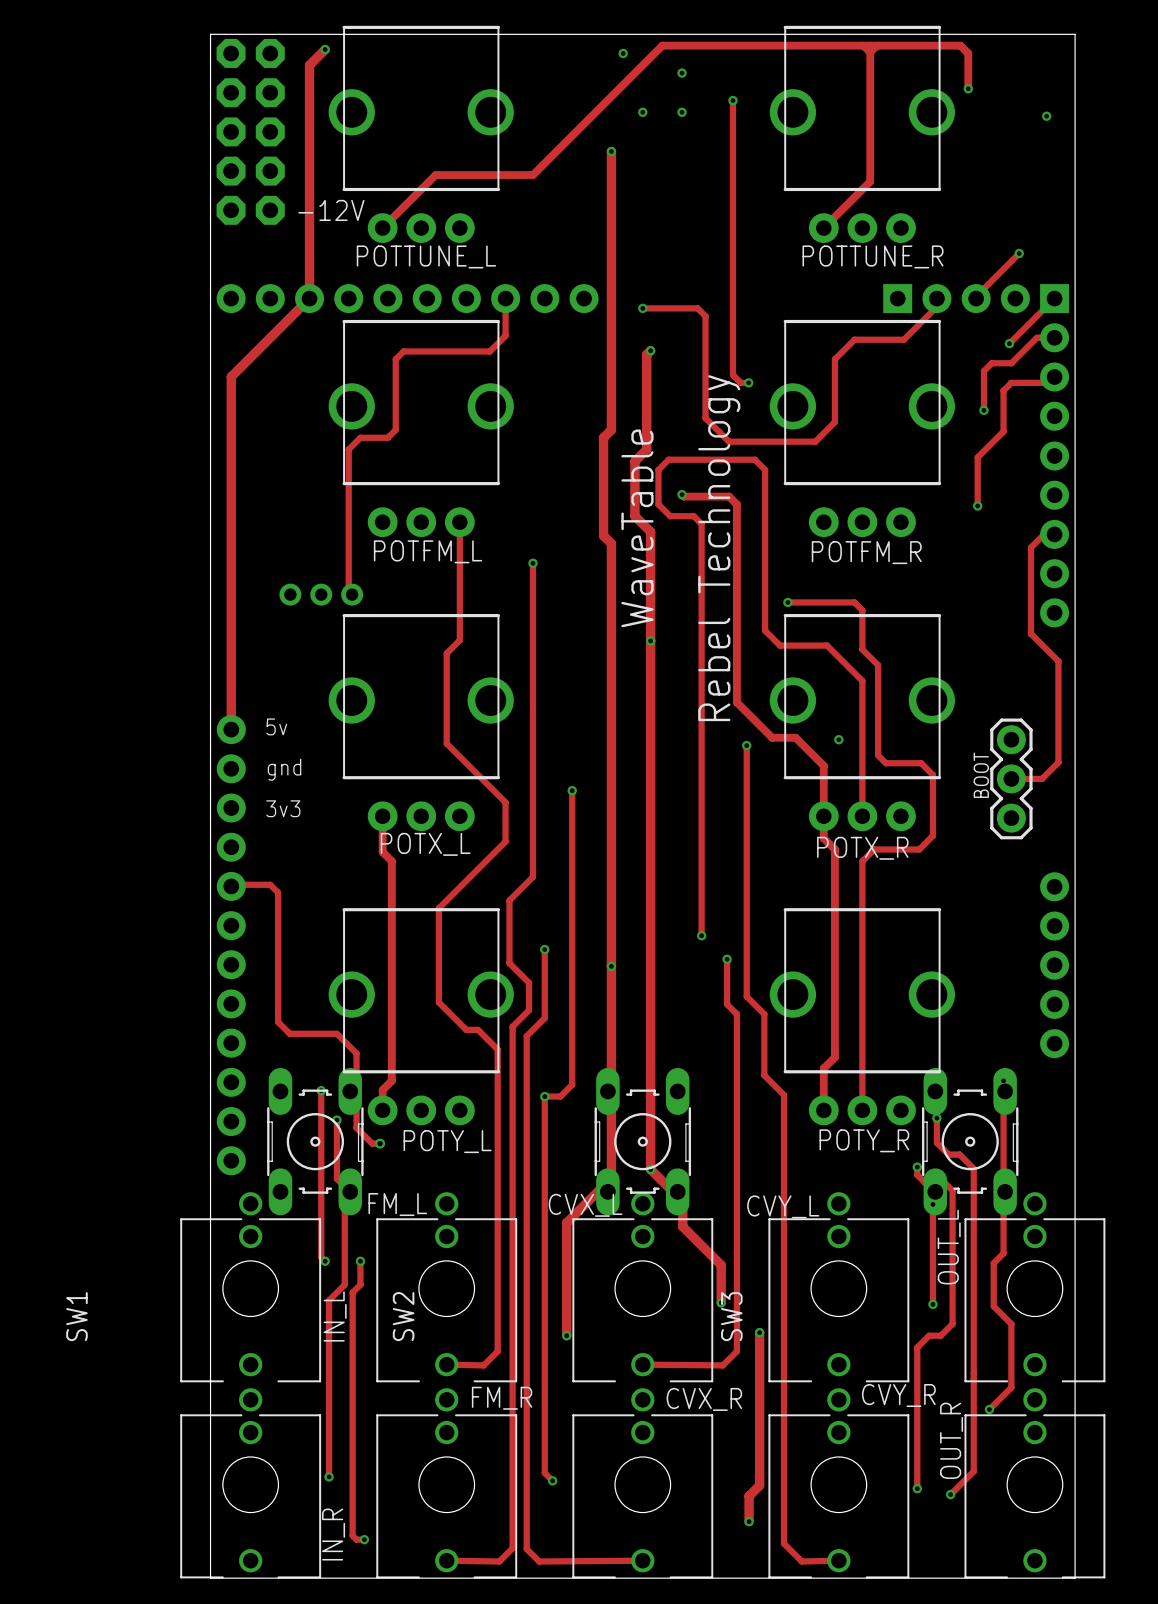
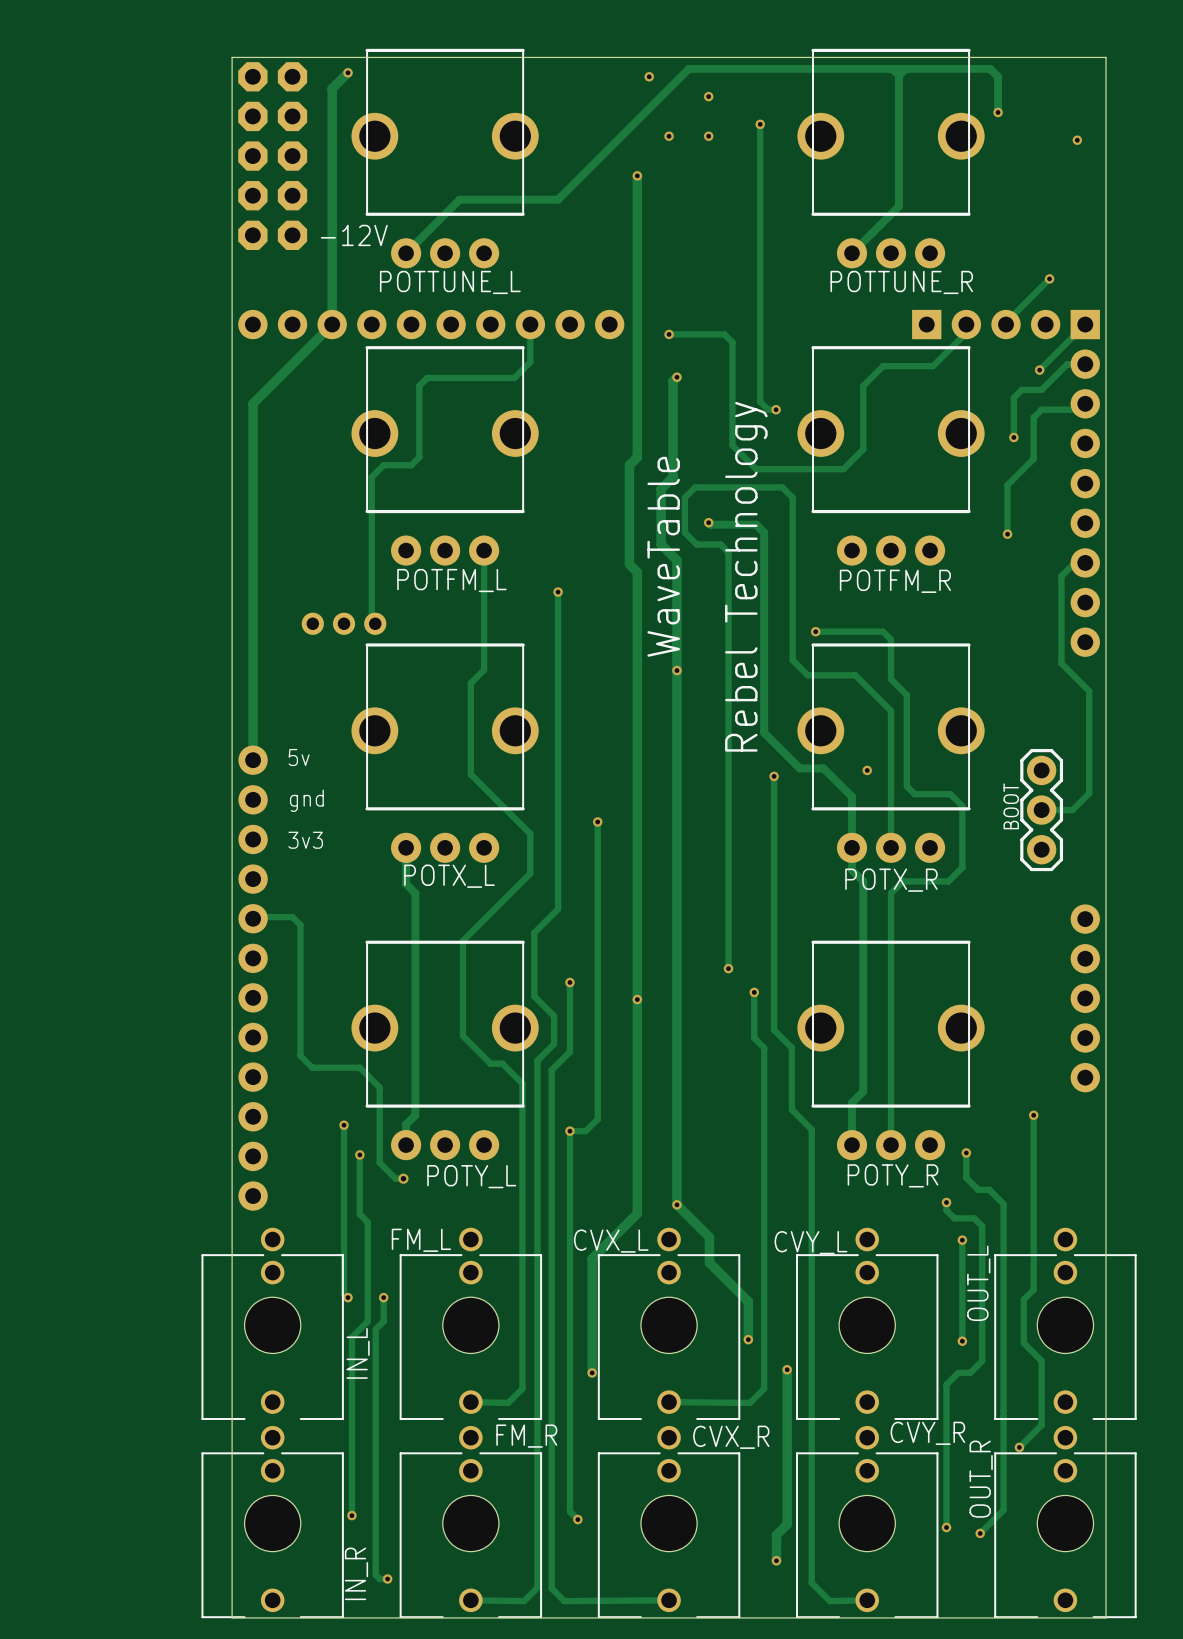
SW1: (315, 1141) -> none
SW2: (642, 1141) -> none
SW3: (970, 1141) -> none

